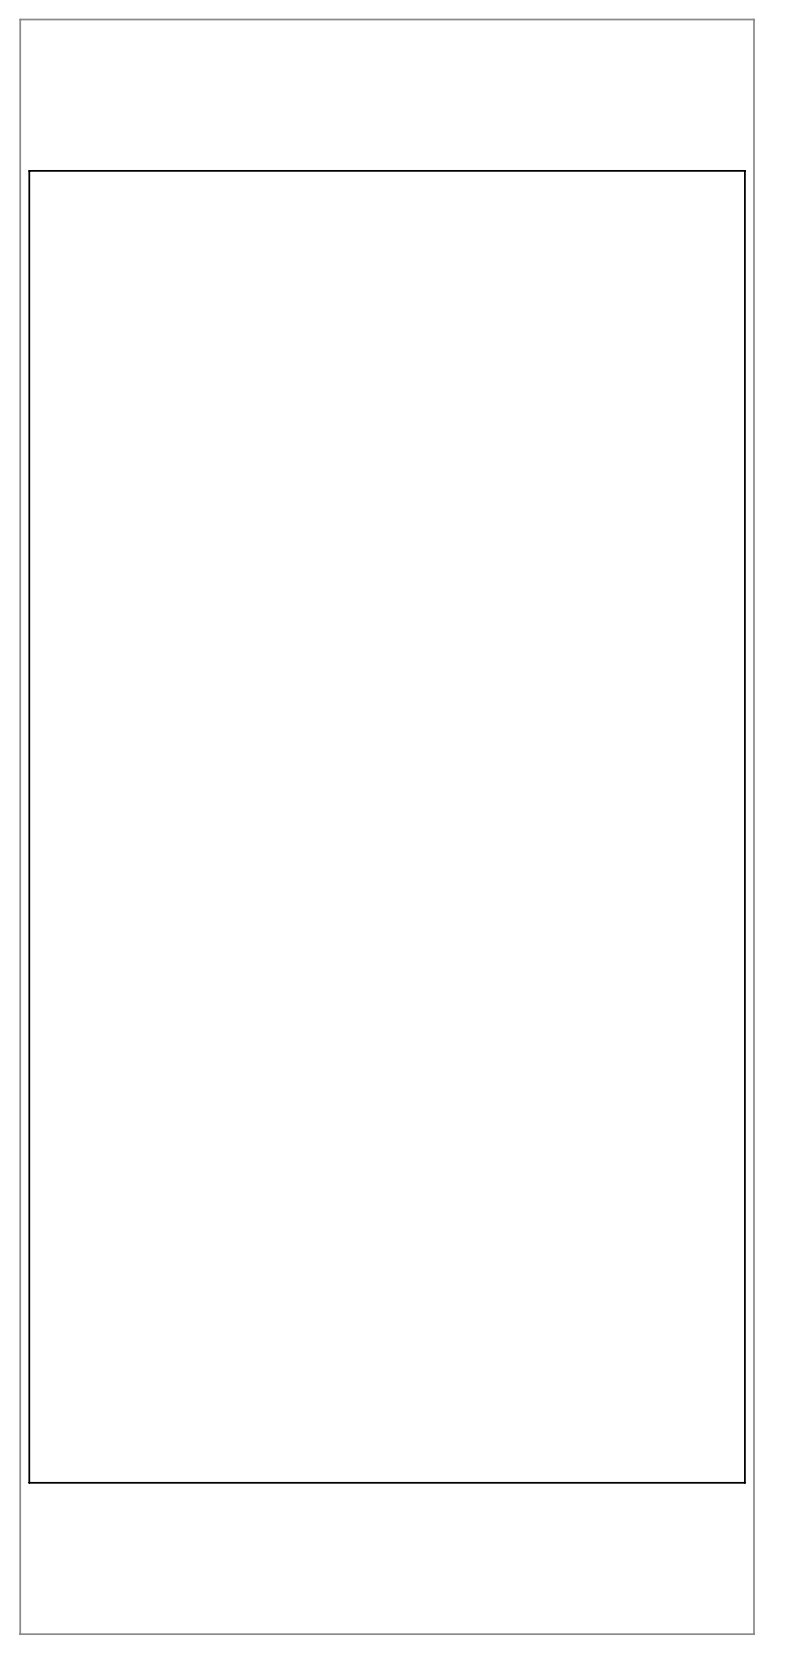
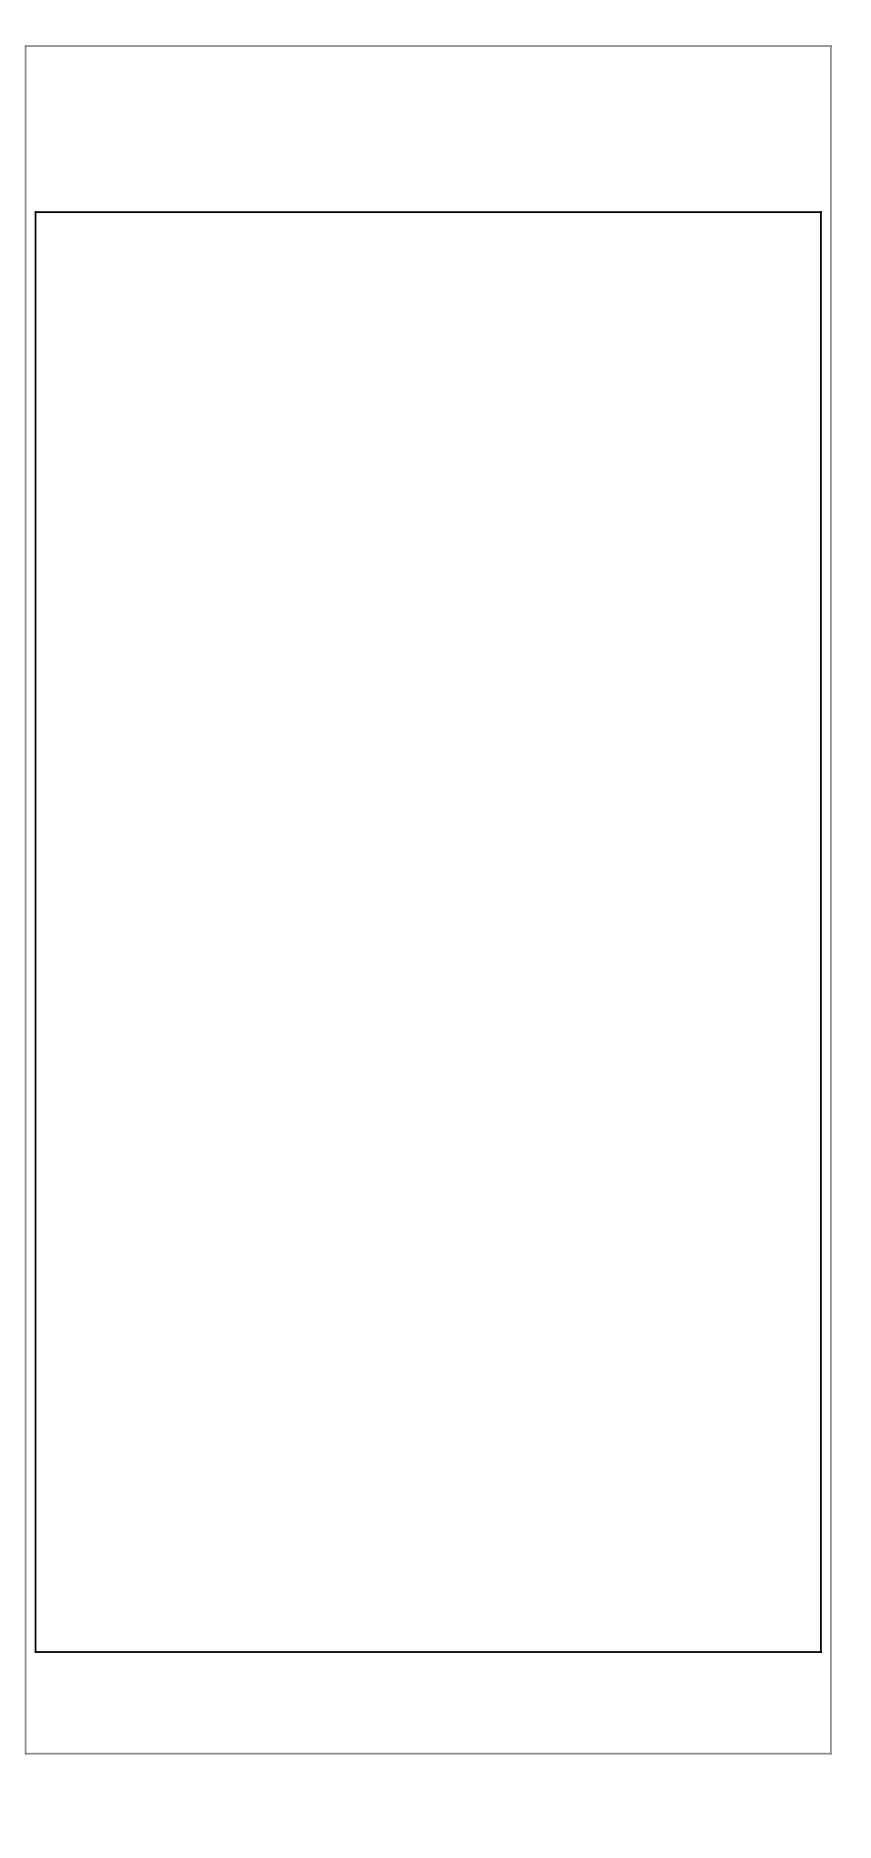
line: (20, 1575) (20, 1634) (753, 1634) (753, 1575) -> (25, 1753) (830, 1753)

